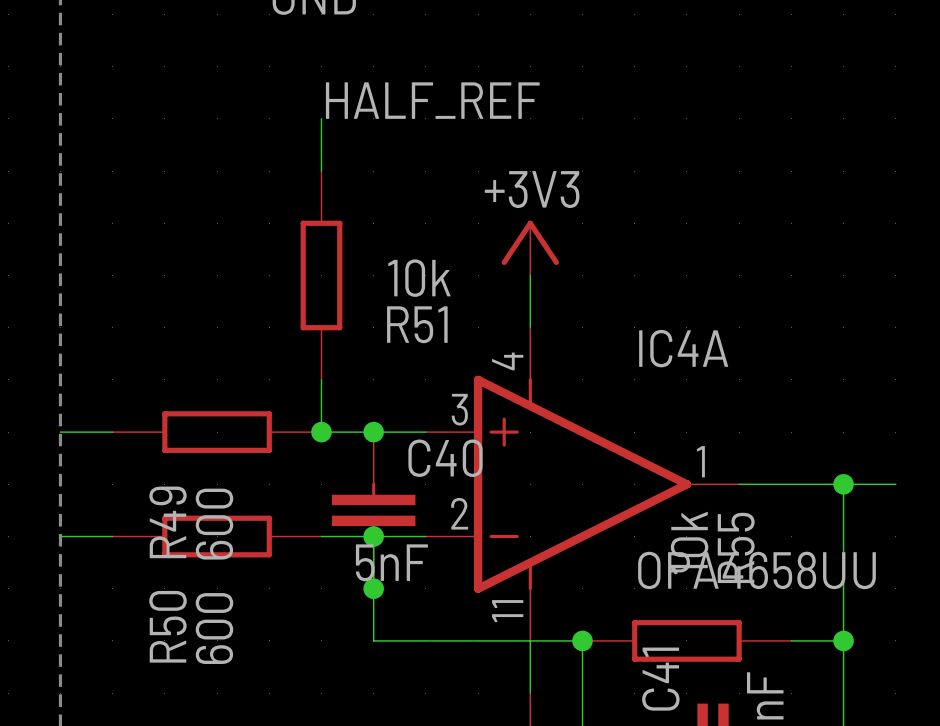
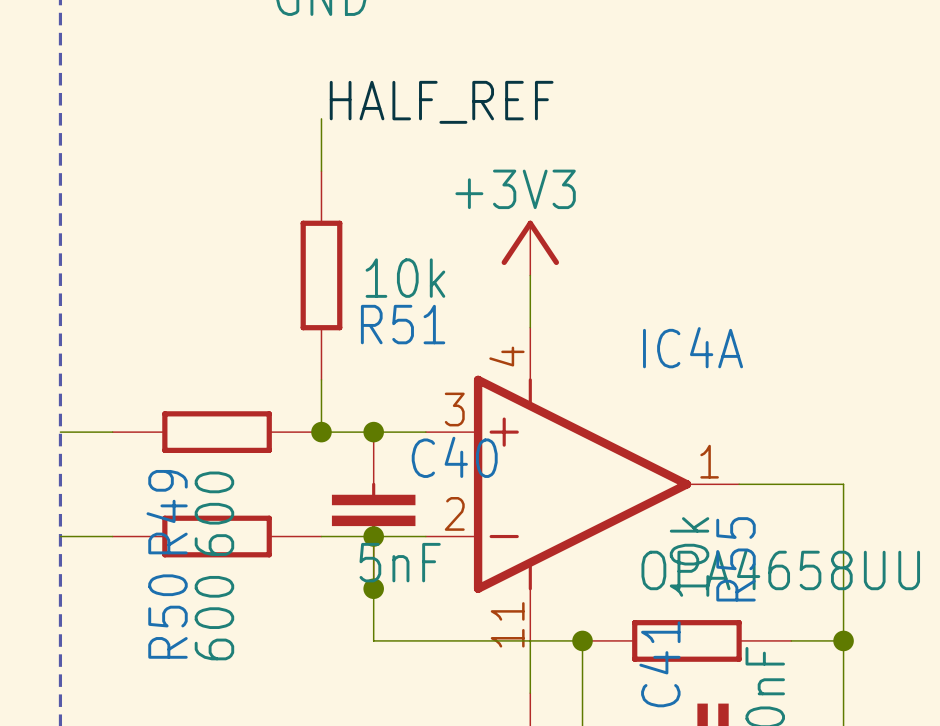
wire: (843, 484) (895, 484) -> none
junction: (843, 484) -> none

